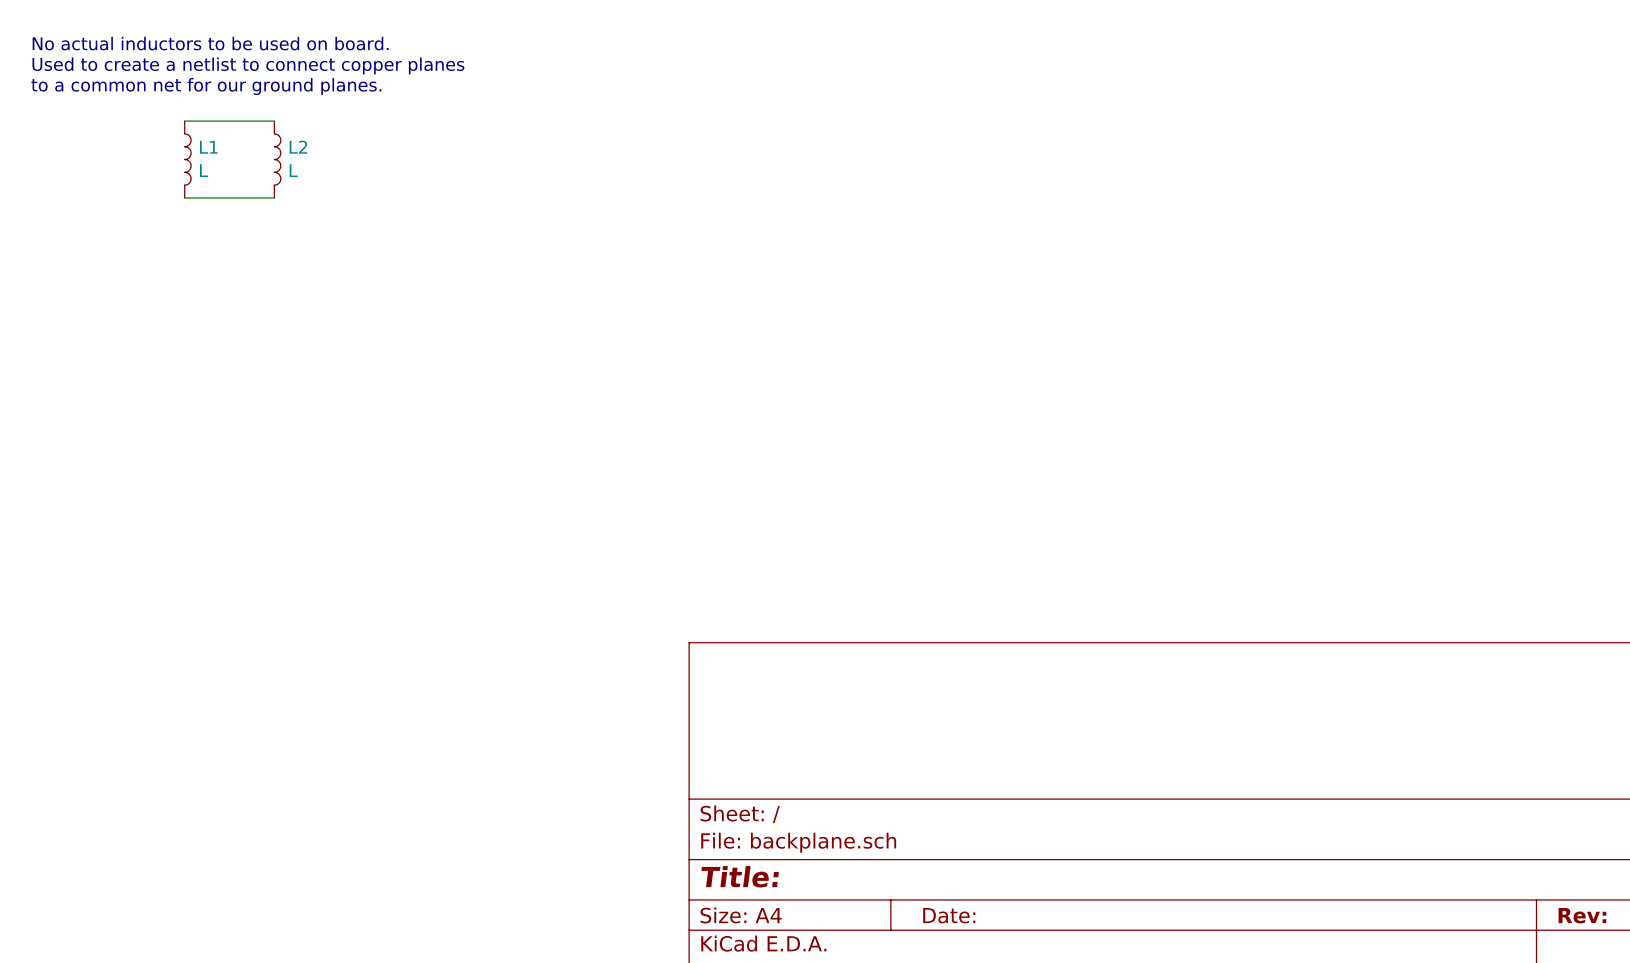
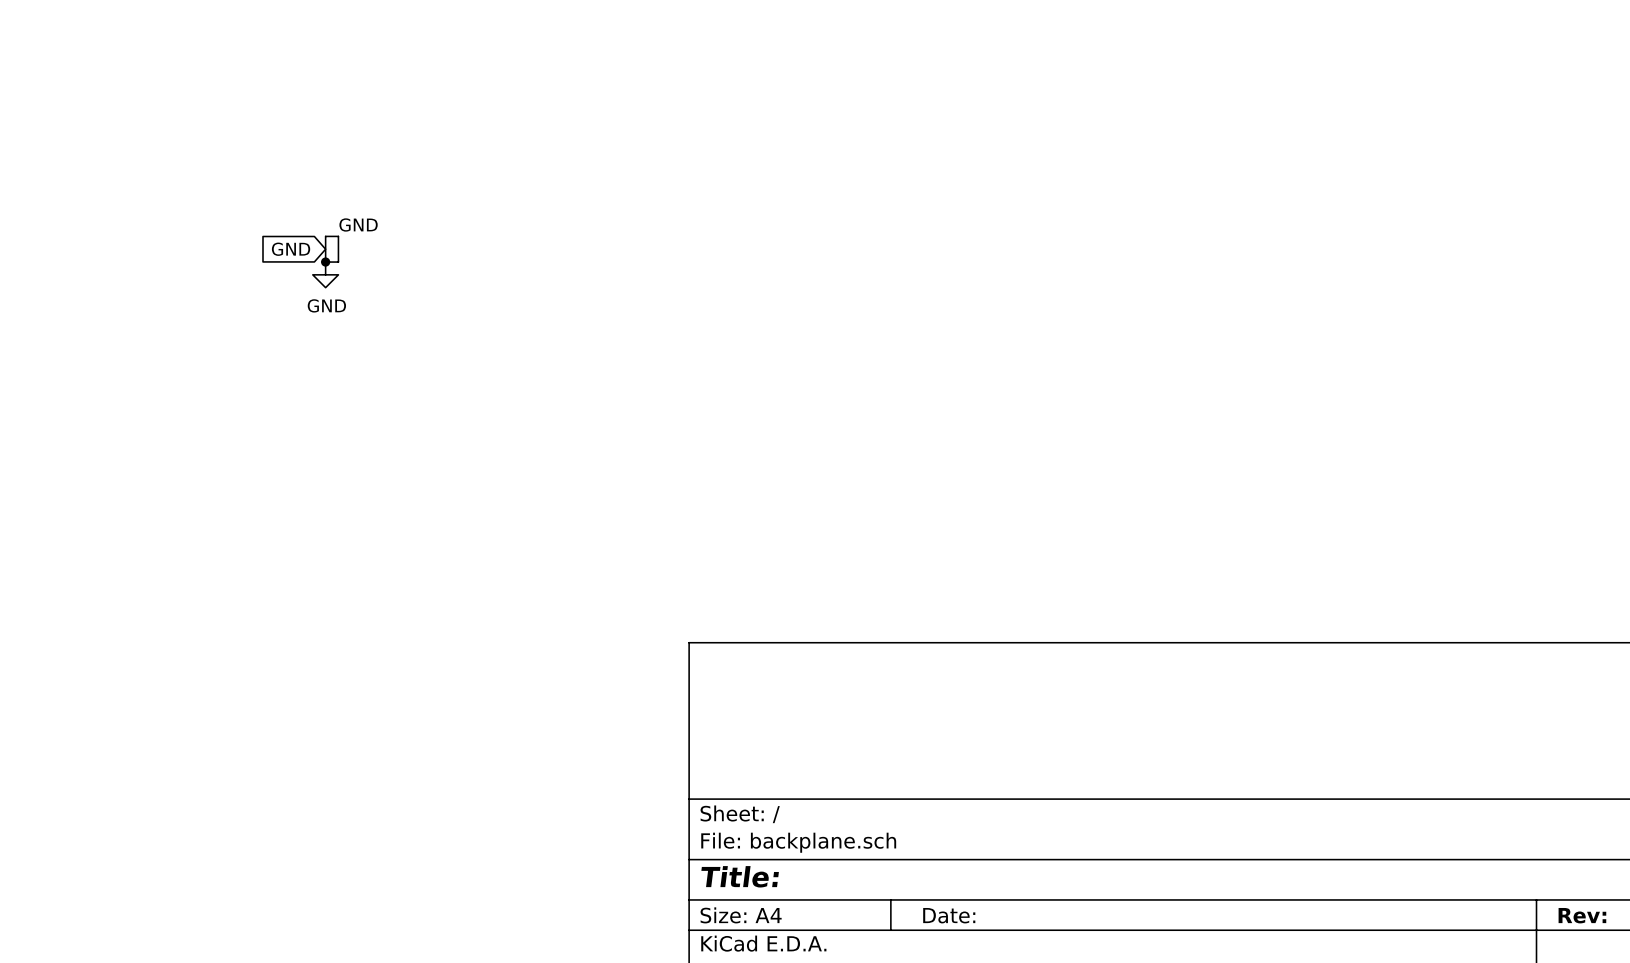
text: No actual inductors to be used on board. (210, 43) -> none
text: Used to create a netlist to connect copper planes (248, 65) -> none
text: to a common net for our ground planes. (206, 86) -> none
wire: (184, 121) (274, 121) -> none
L1: L (187, 159) -> none
L2: L (277, 159) -> none
wire: (184, 197) (274, 197) -> none
label: none -> GND (358, 224)
wire: none -> (325, 236) (338, 236) (338, 262) (325, 262) (325, 236)
global label: none -> GND (291, 249)
junction: none -> (325, 262)
power symbol: none -> GND (325, 274)

